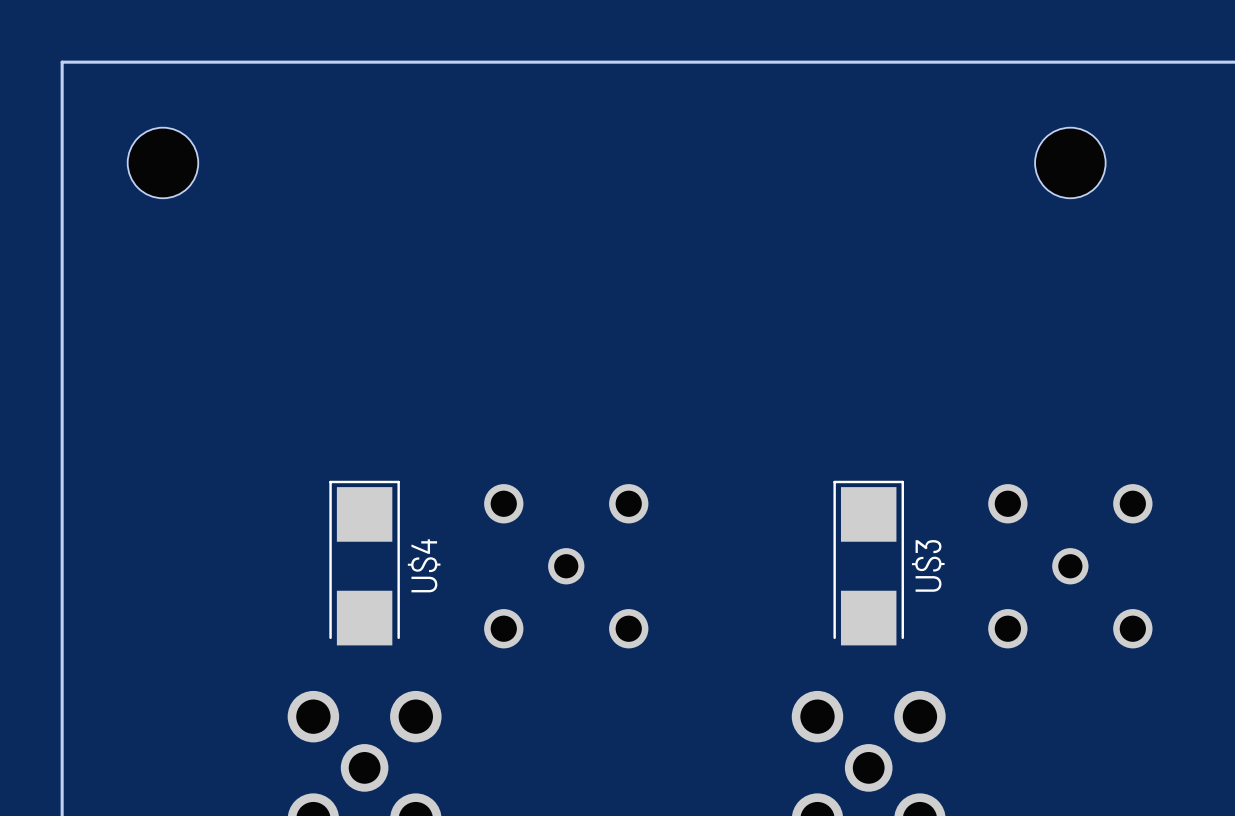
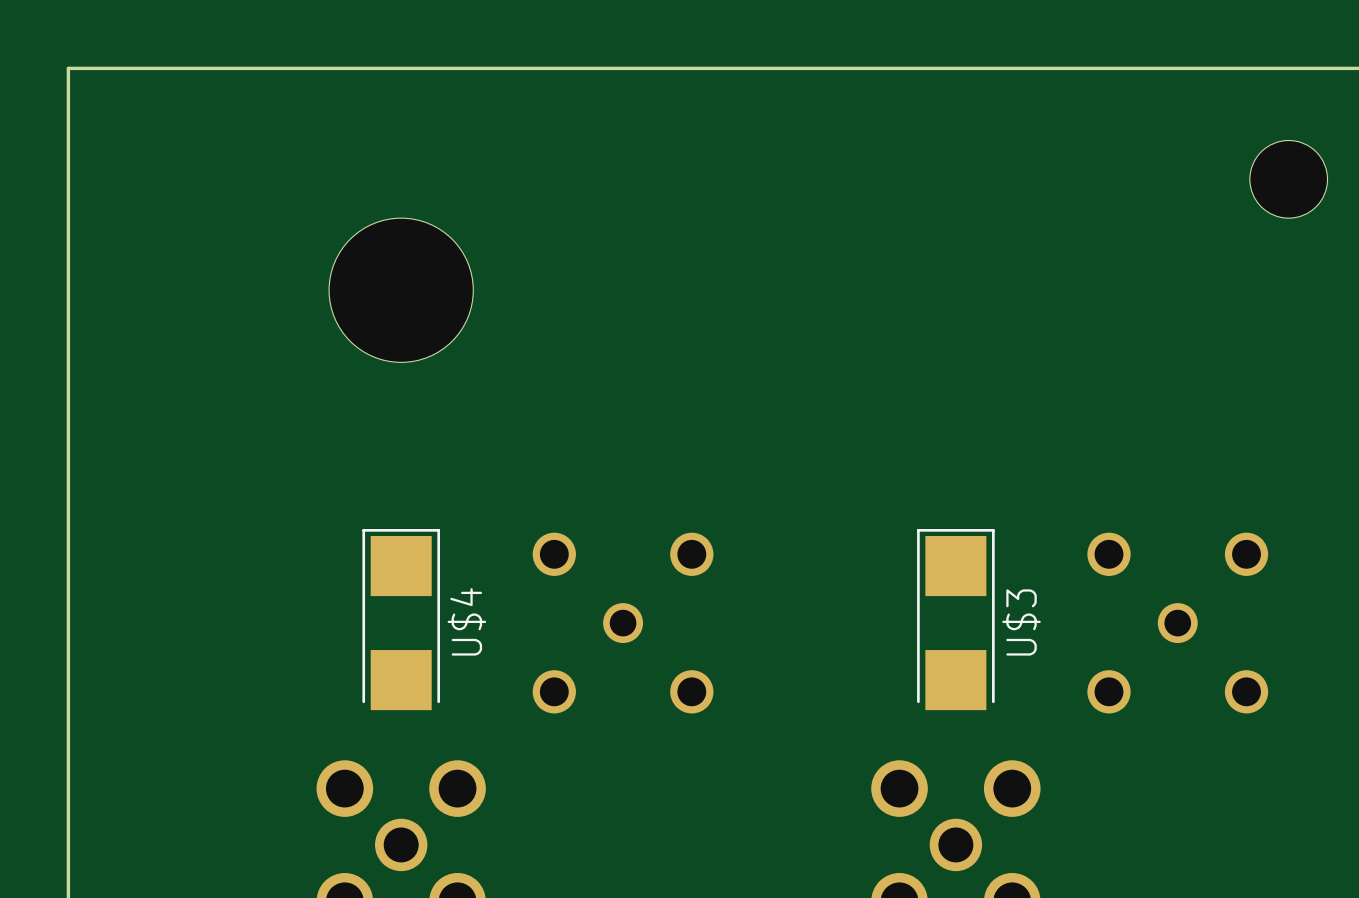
hole: (162, 162) -> none
hole position: (1070, 162) -> (1288, 179)
hole: none -> (401, 290)

